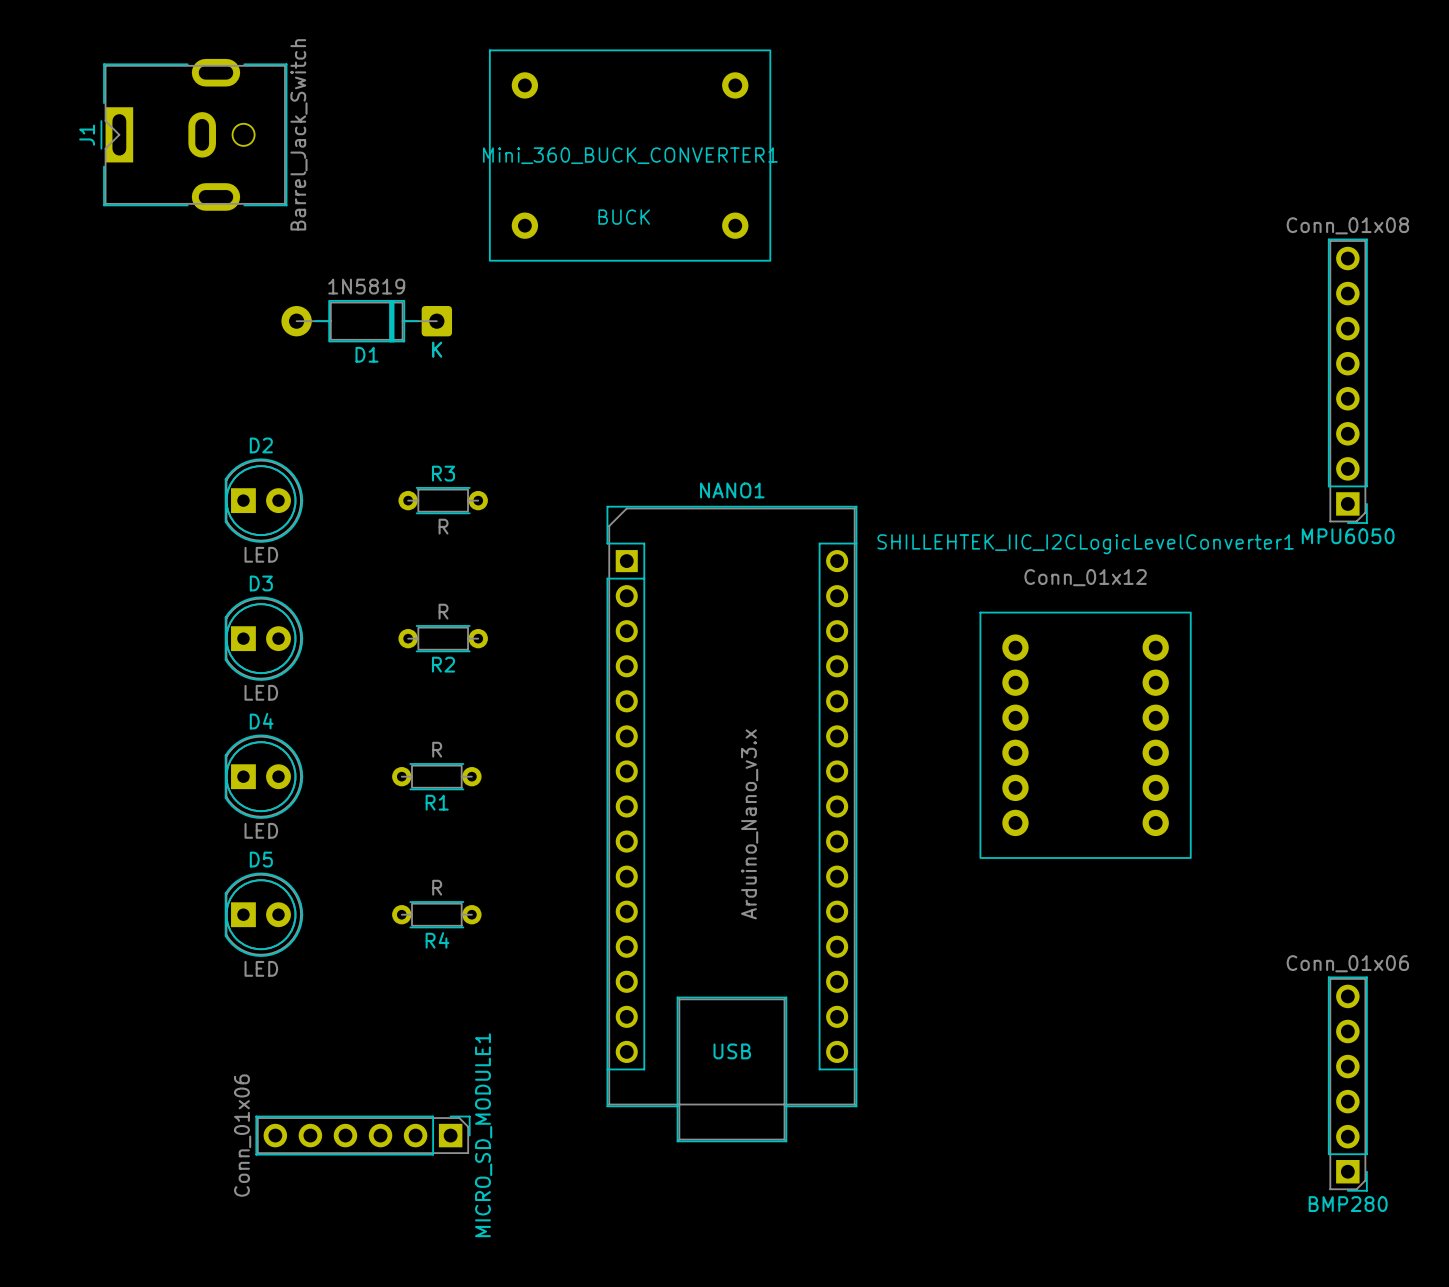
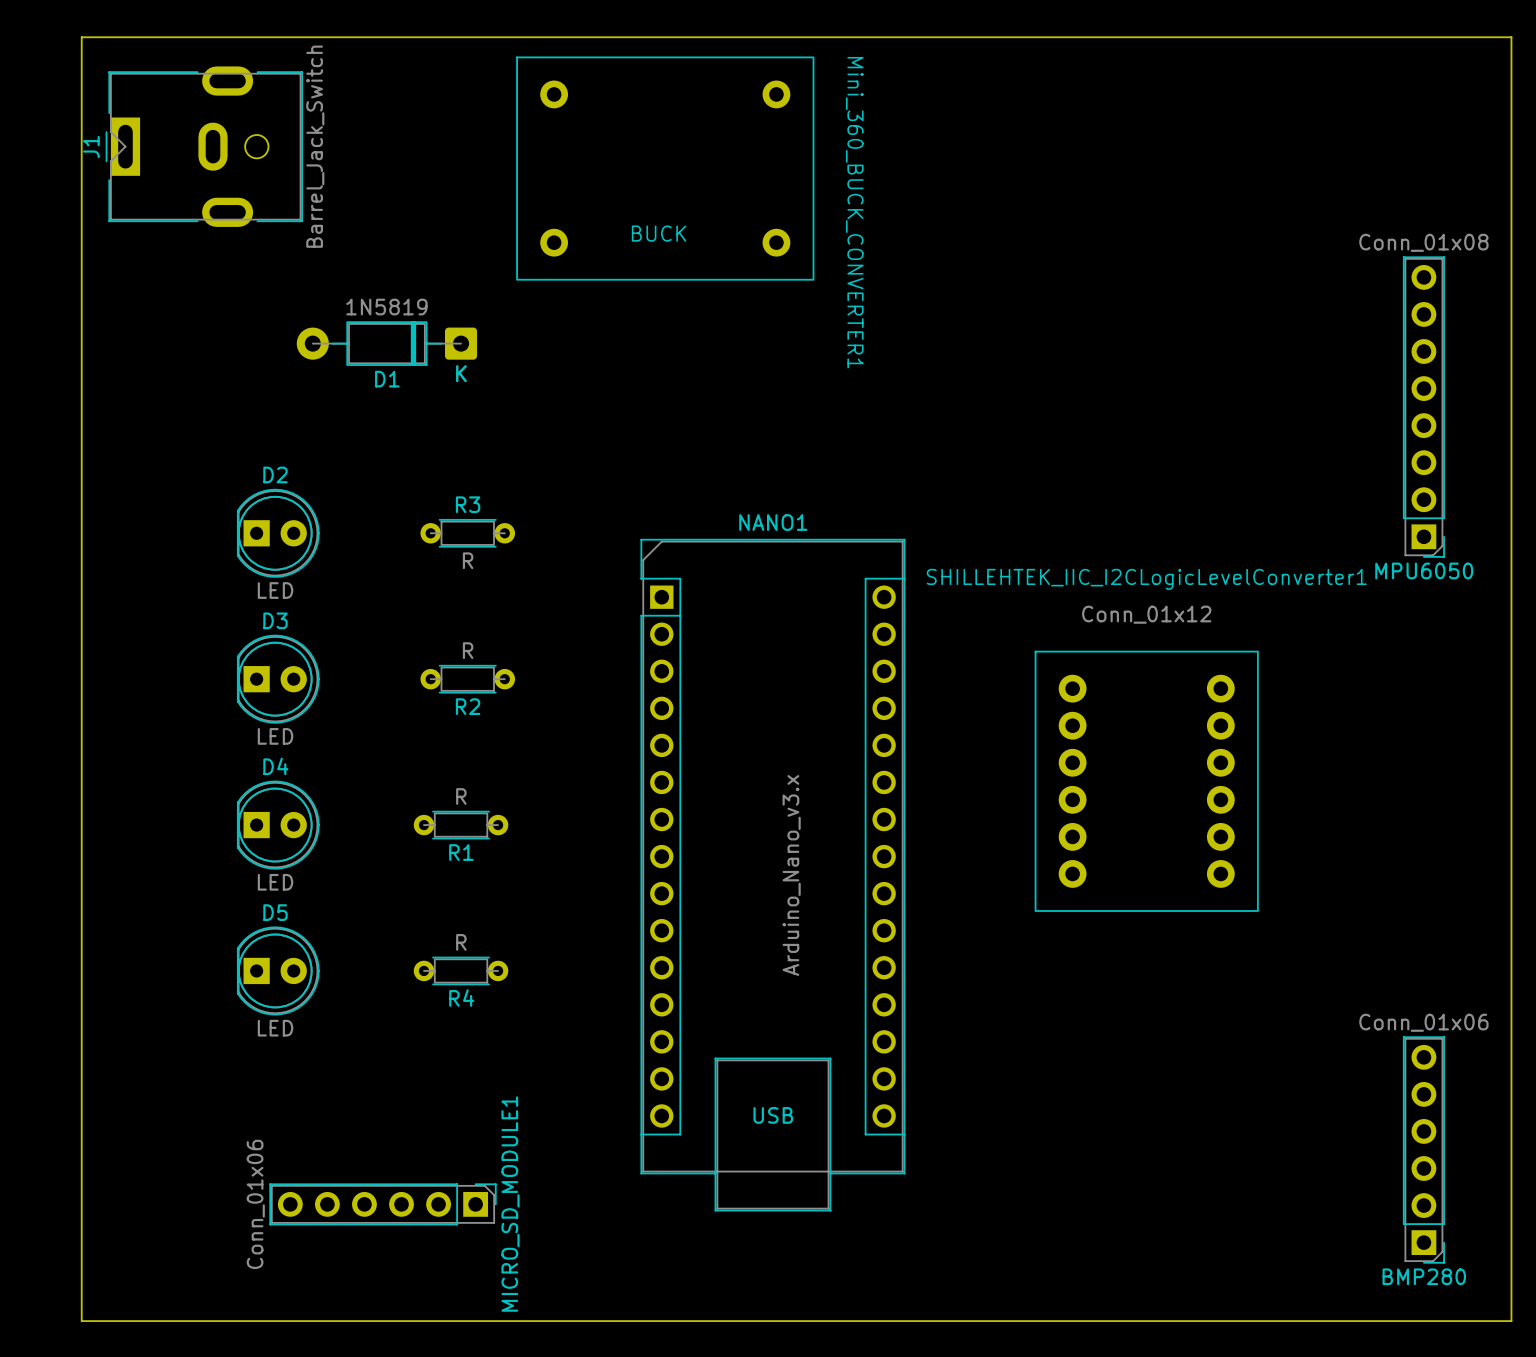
board edge: none -> (81, 37) (1511, 37) (1511, 1321) (81, 1321) (81, 37)
Mini_360_BUCK_CONVERTER1 name rotation: 0° (630, 155) -> 90° clockwise (854, 212)

